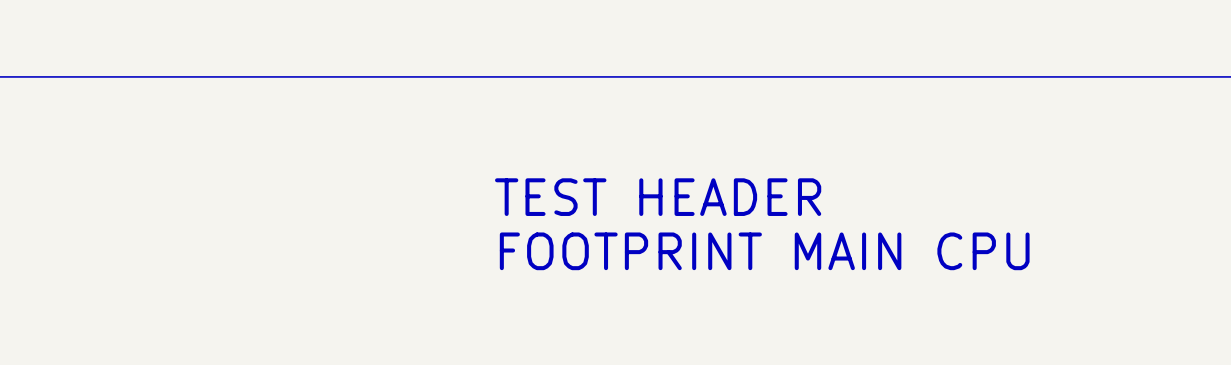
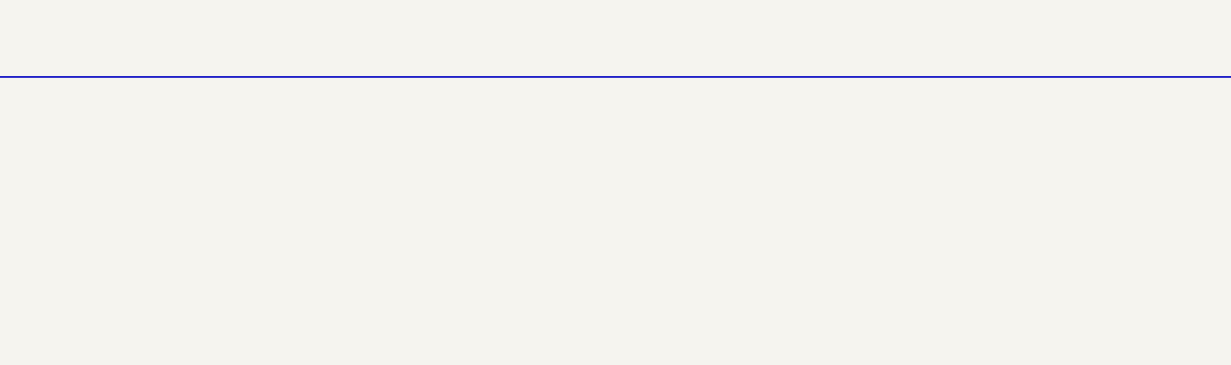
text: TEST HEADER (658, 197) -> none
text: FOOTPRINT MAIN CPU (764, 251) -> none

